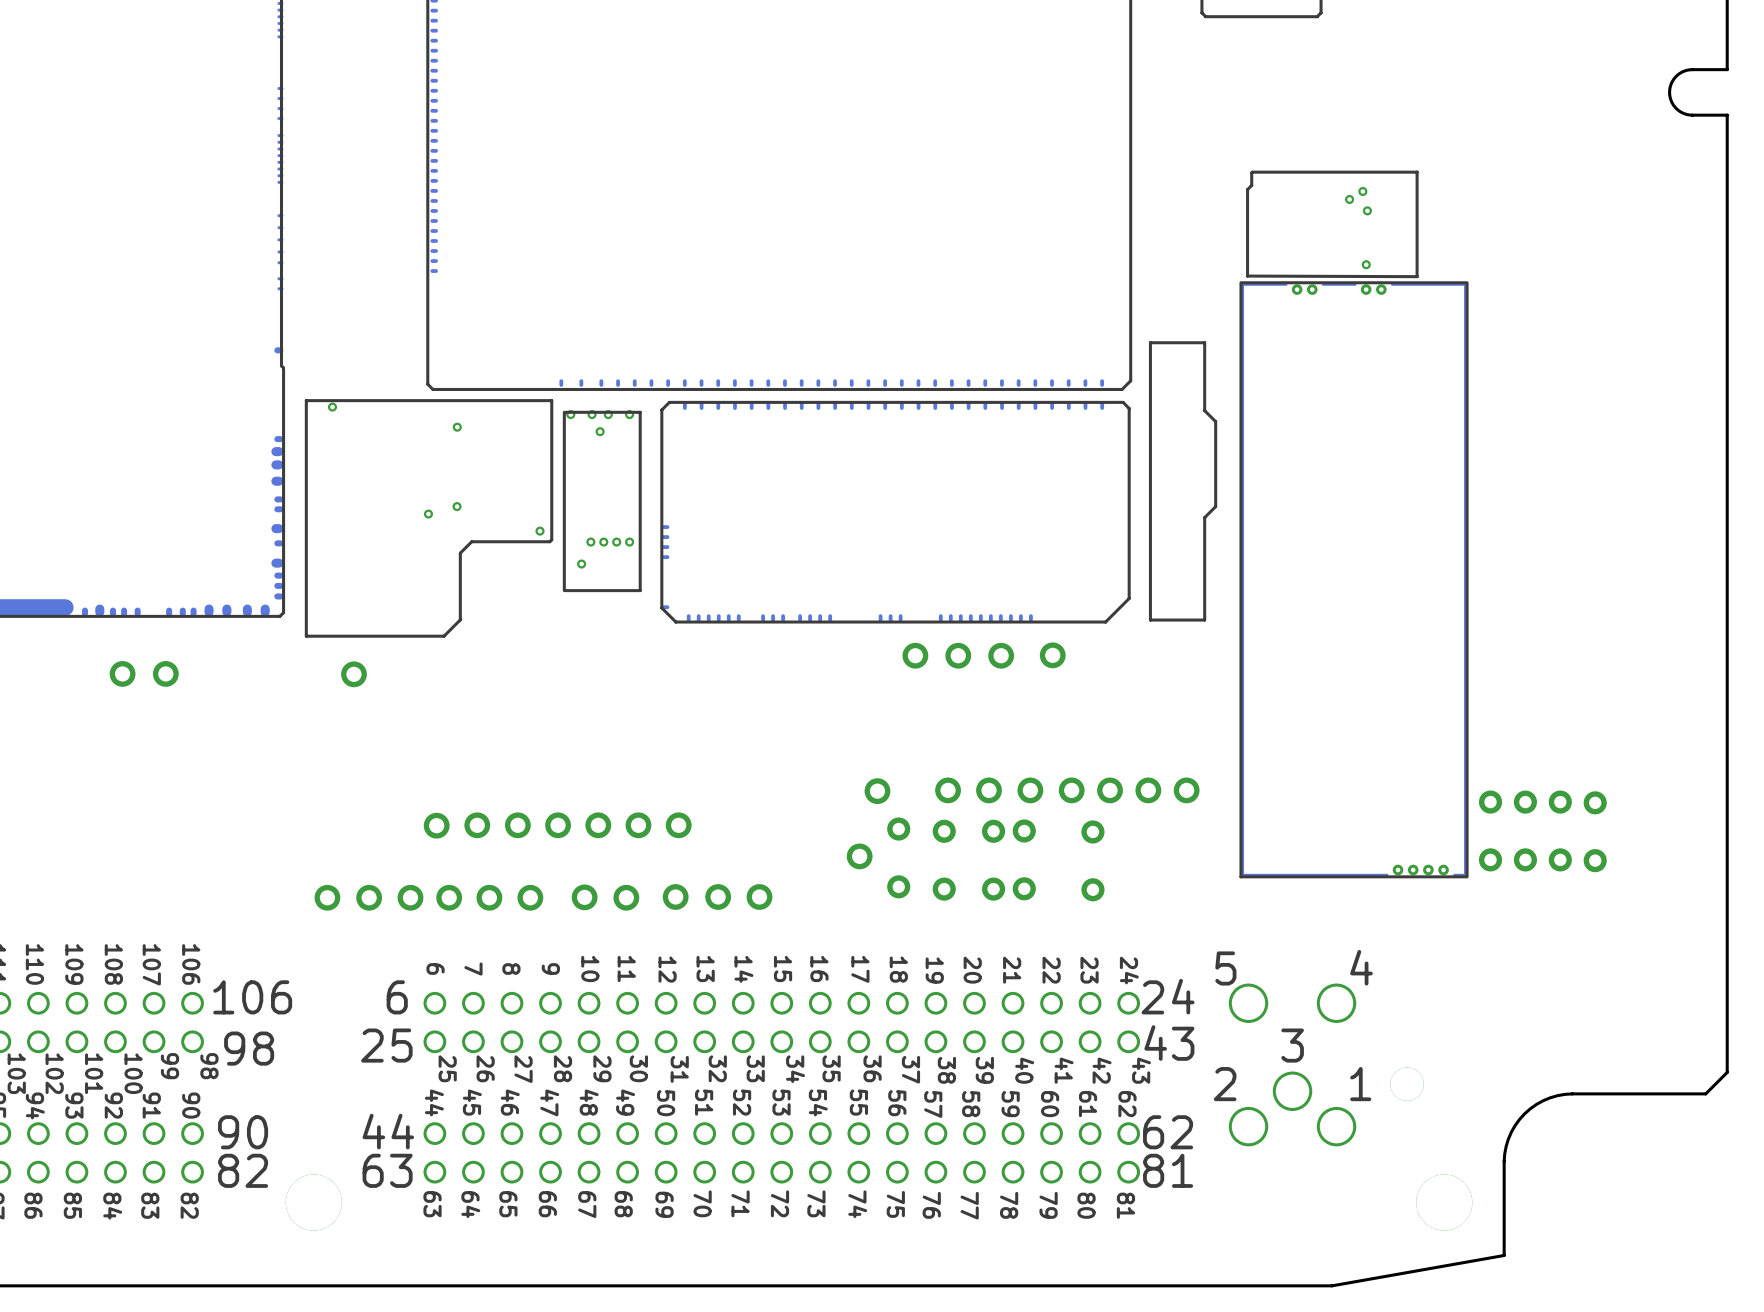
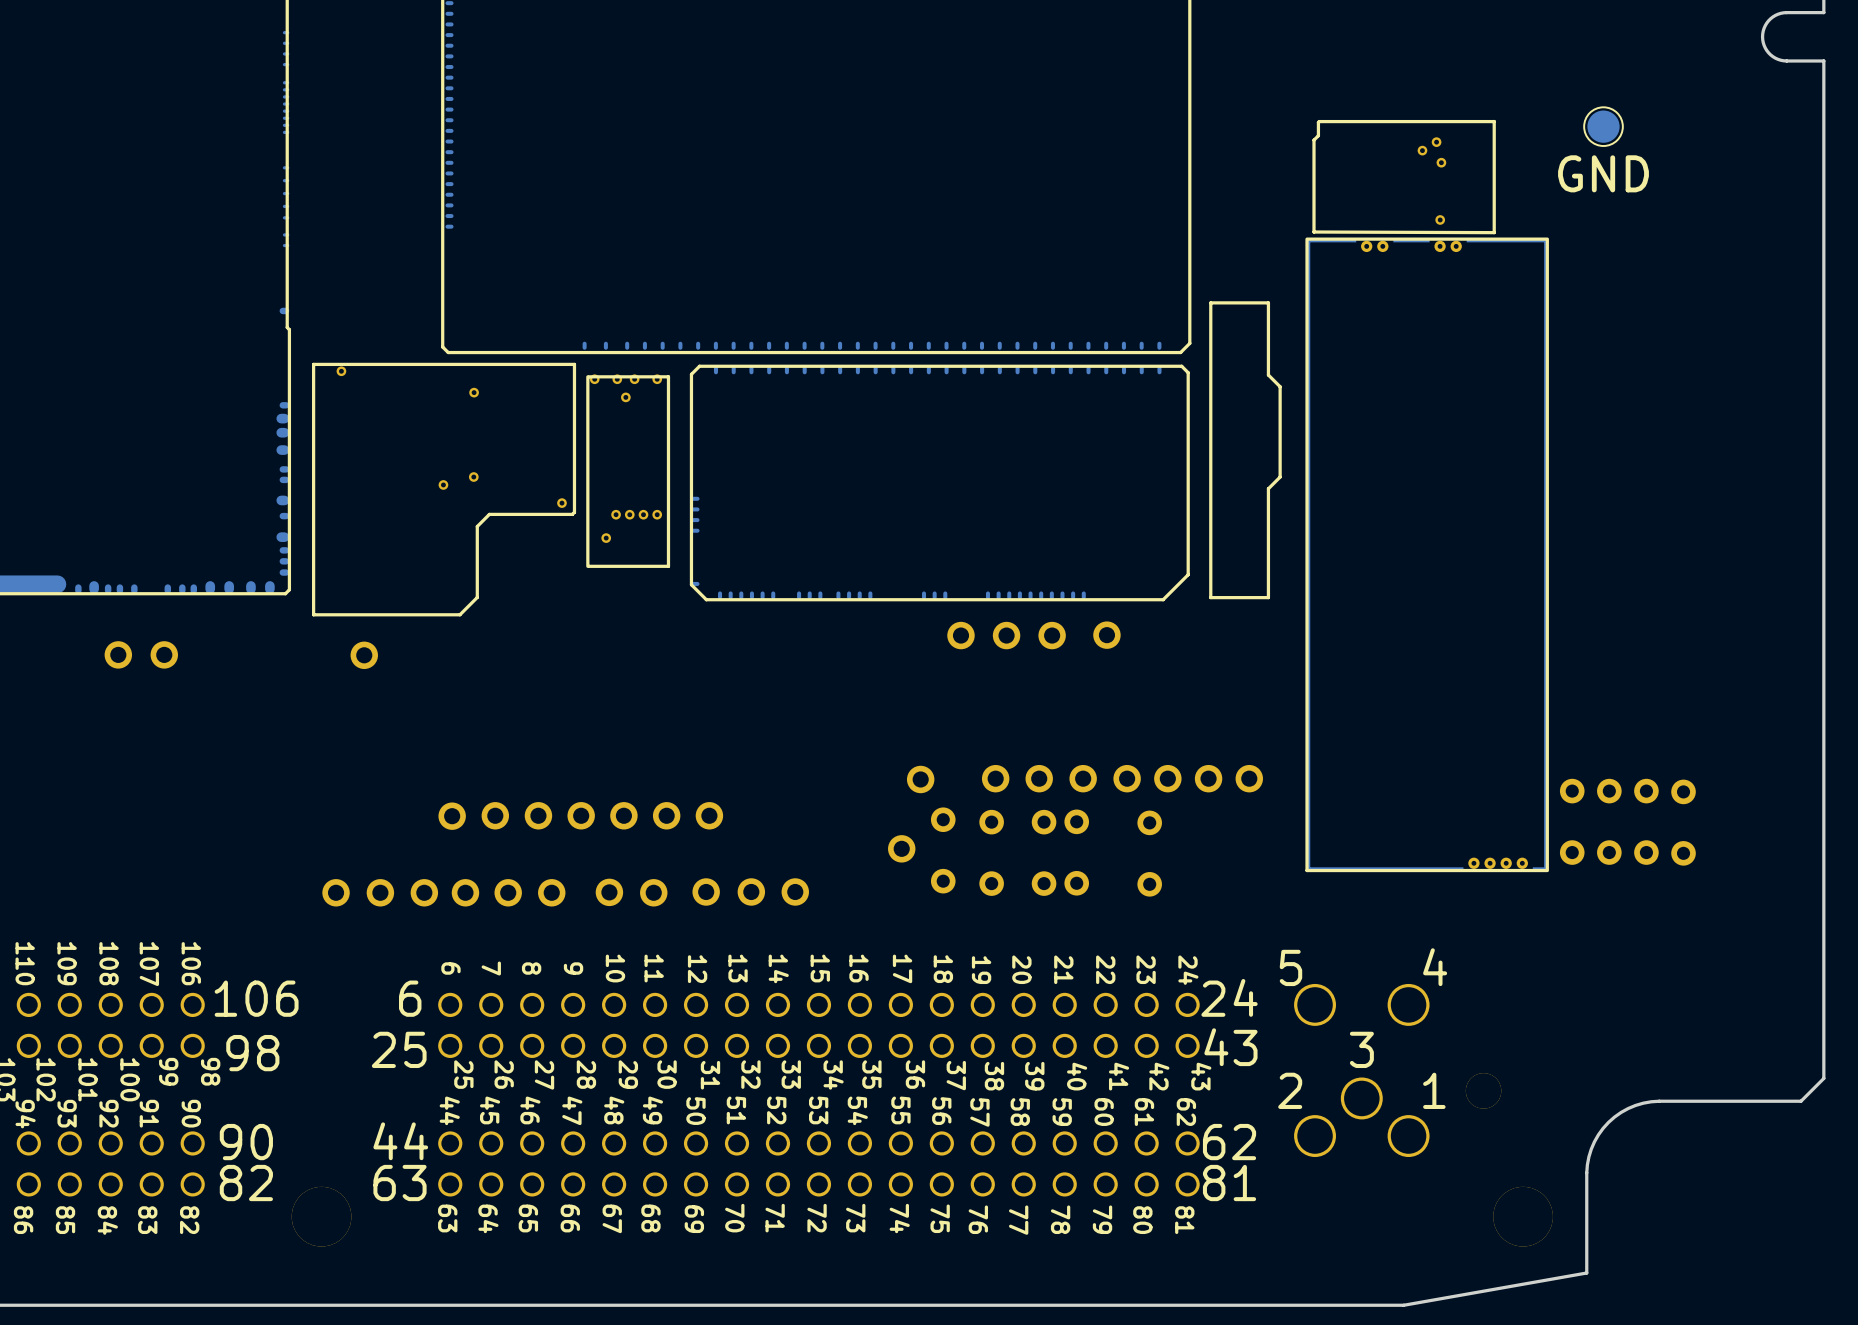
part: none -> (1603, 126)
text: none -> GND (1603, 173)

